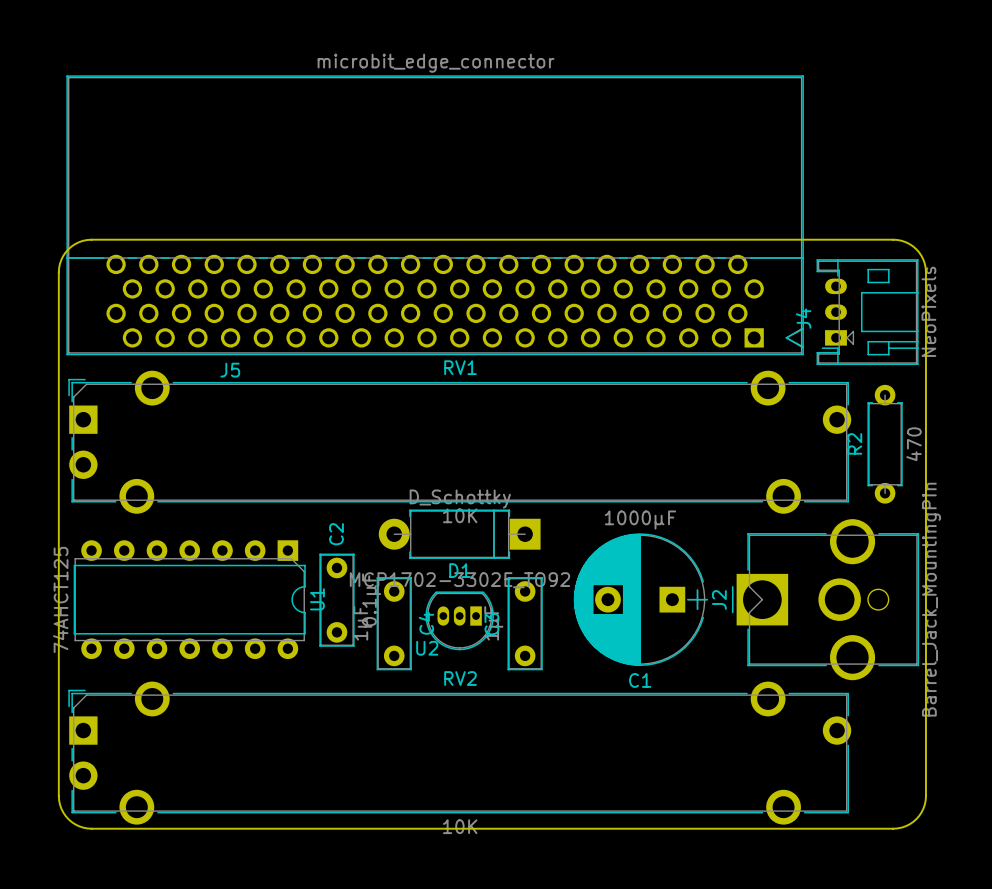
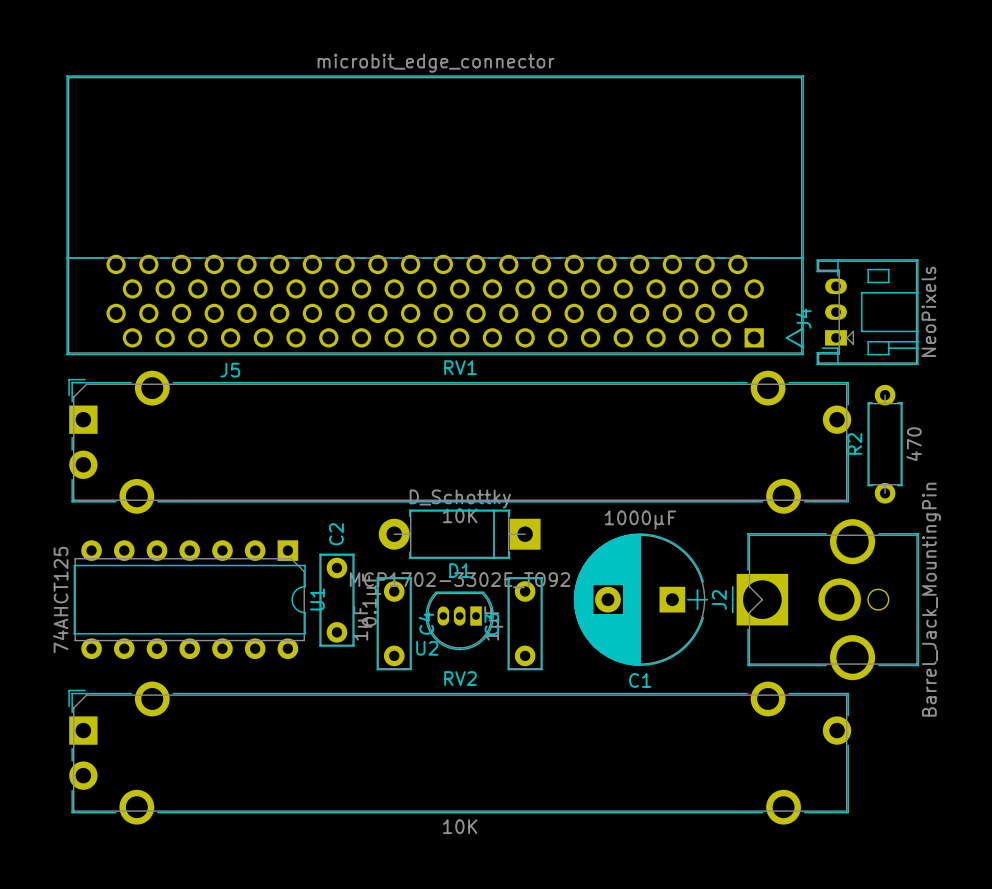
board edge: (91, 239) (893, 239) (901, 240) (913, 246) (923, 259) (925, 272) (925, 795) (924, 804) (919, 815) (909, 824) (893, 828) (91, 828) (83, 827) (71, 821) (63, 812) (58, 795) (58, 272) (61, 259) (68, 249) (79, 242) (91, 239) -> none

